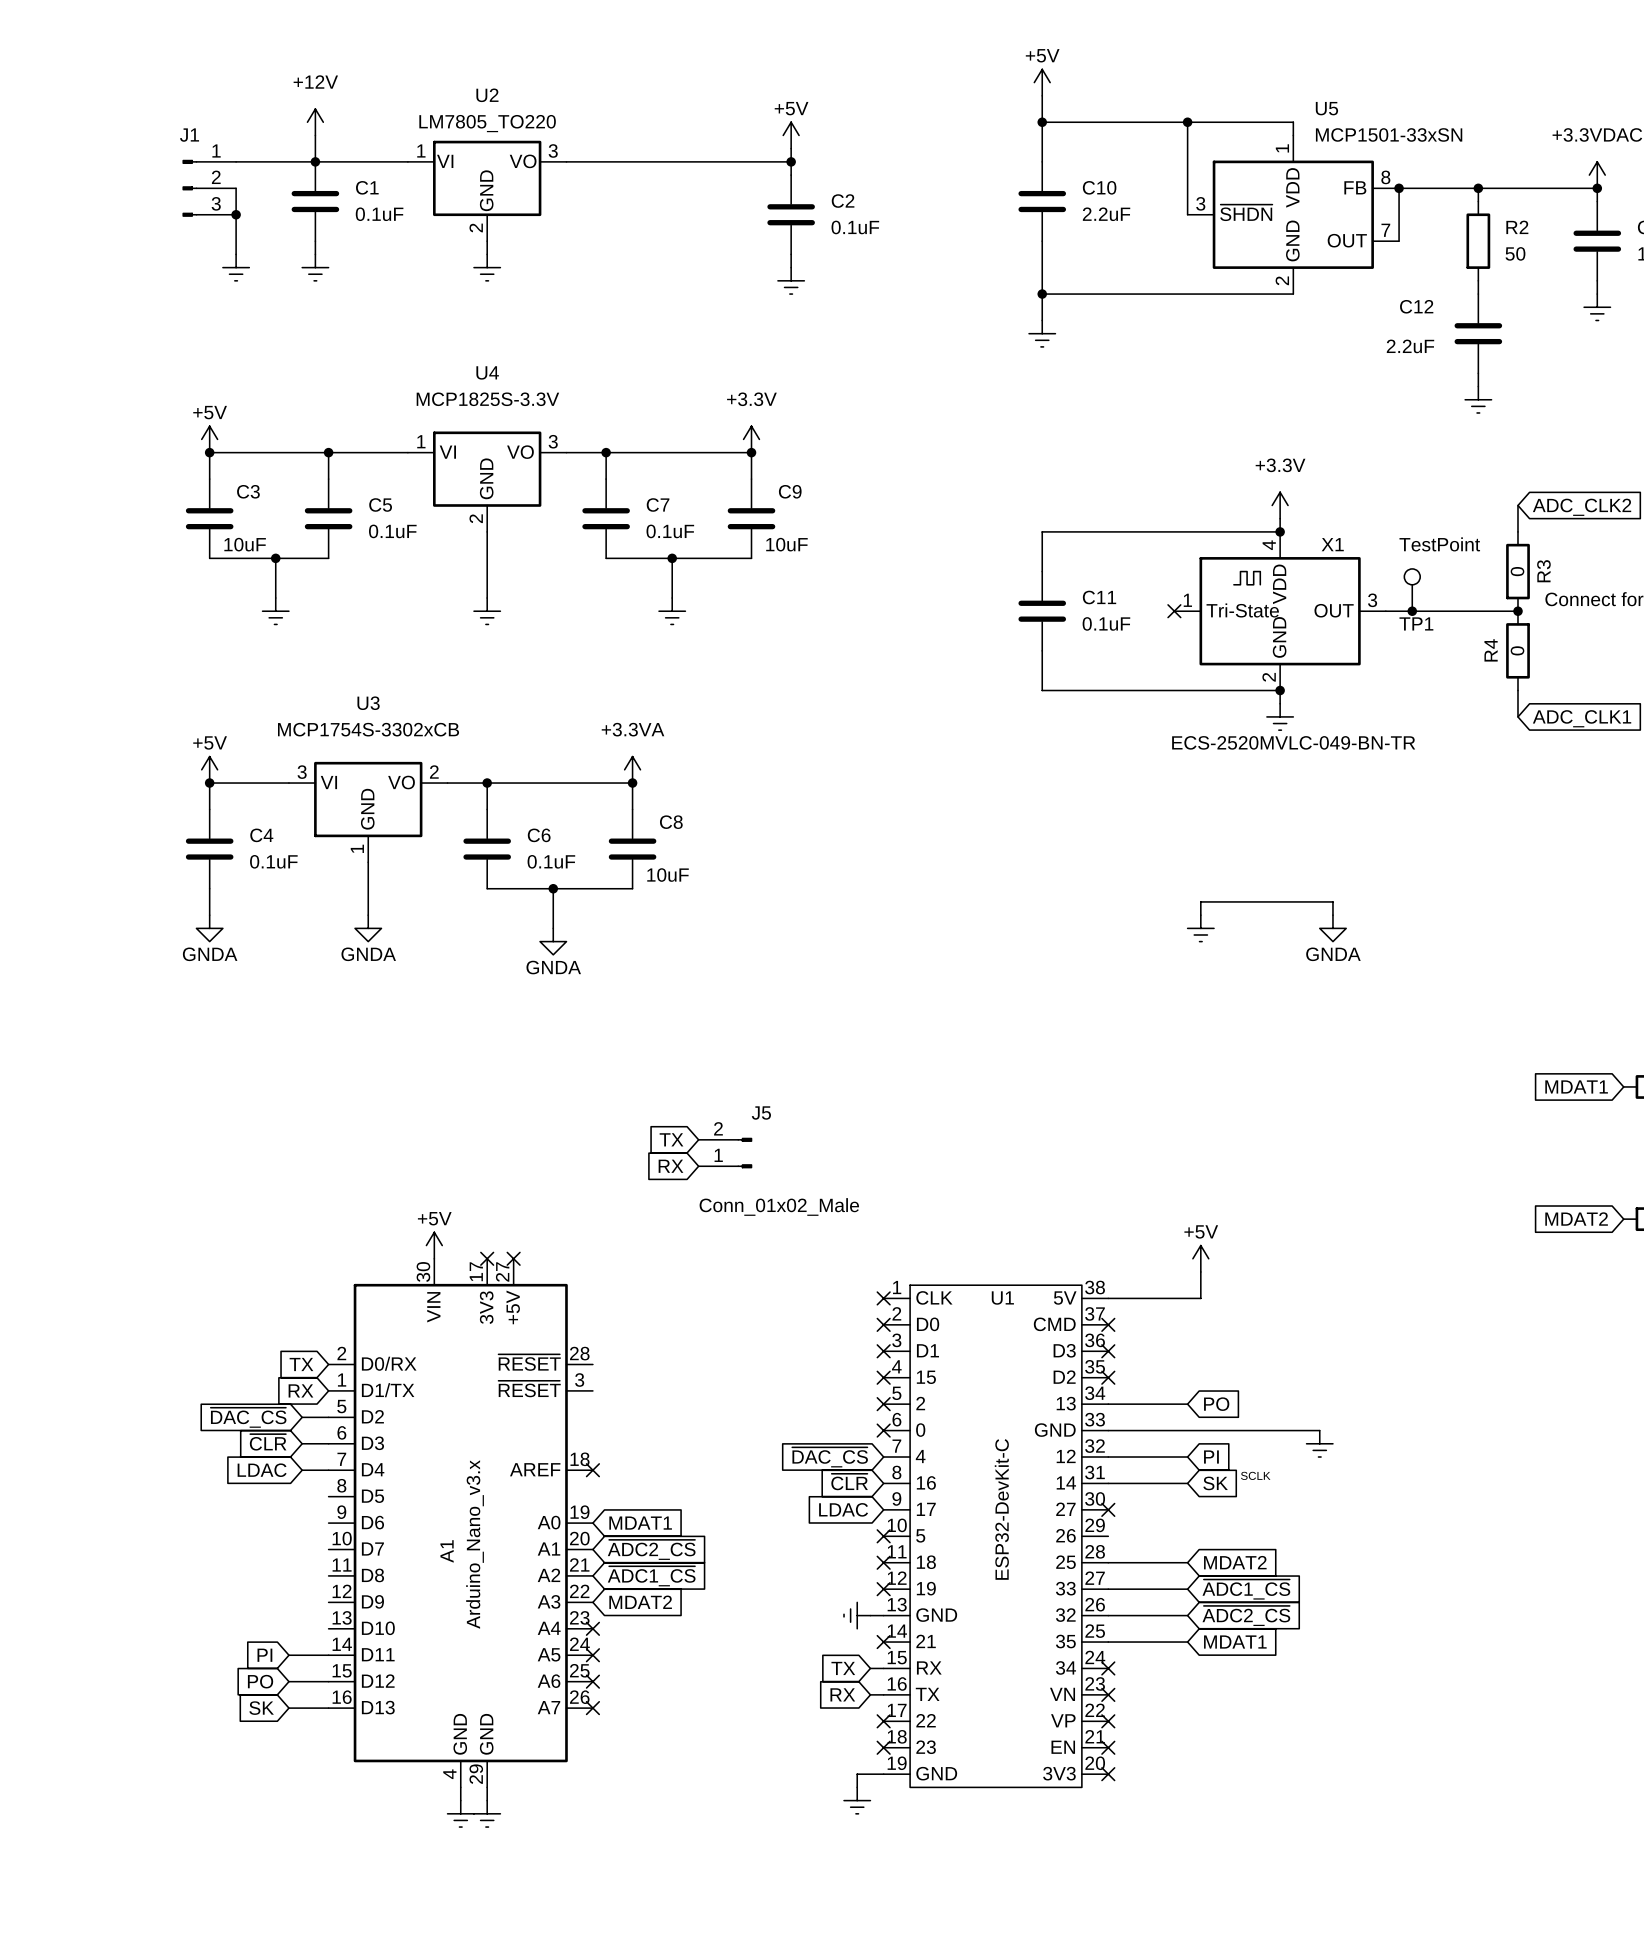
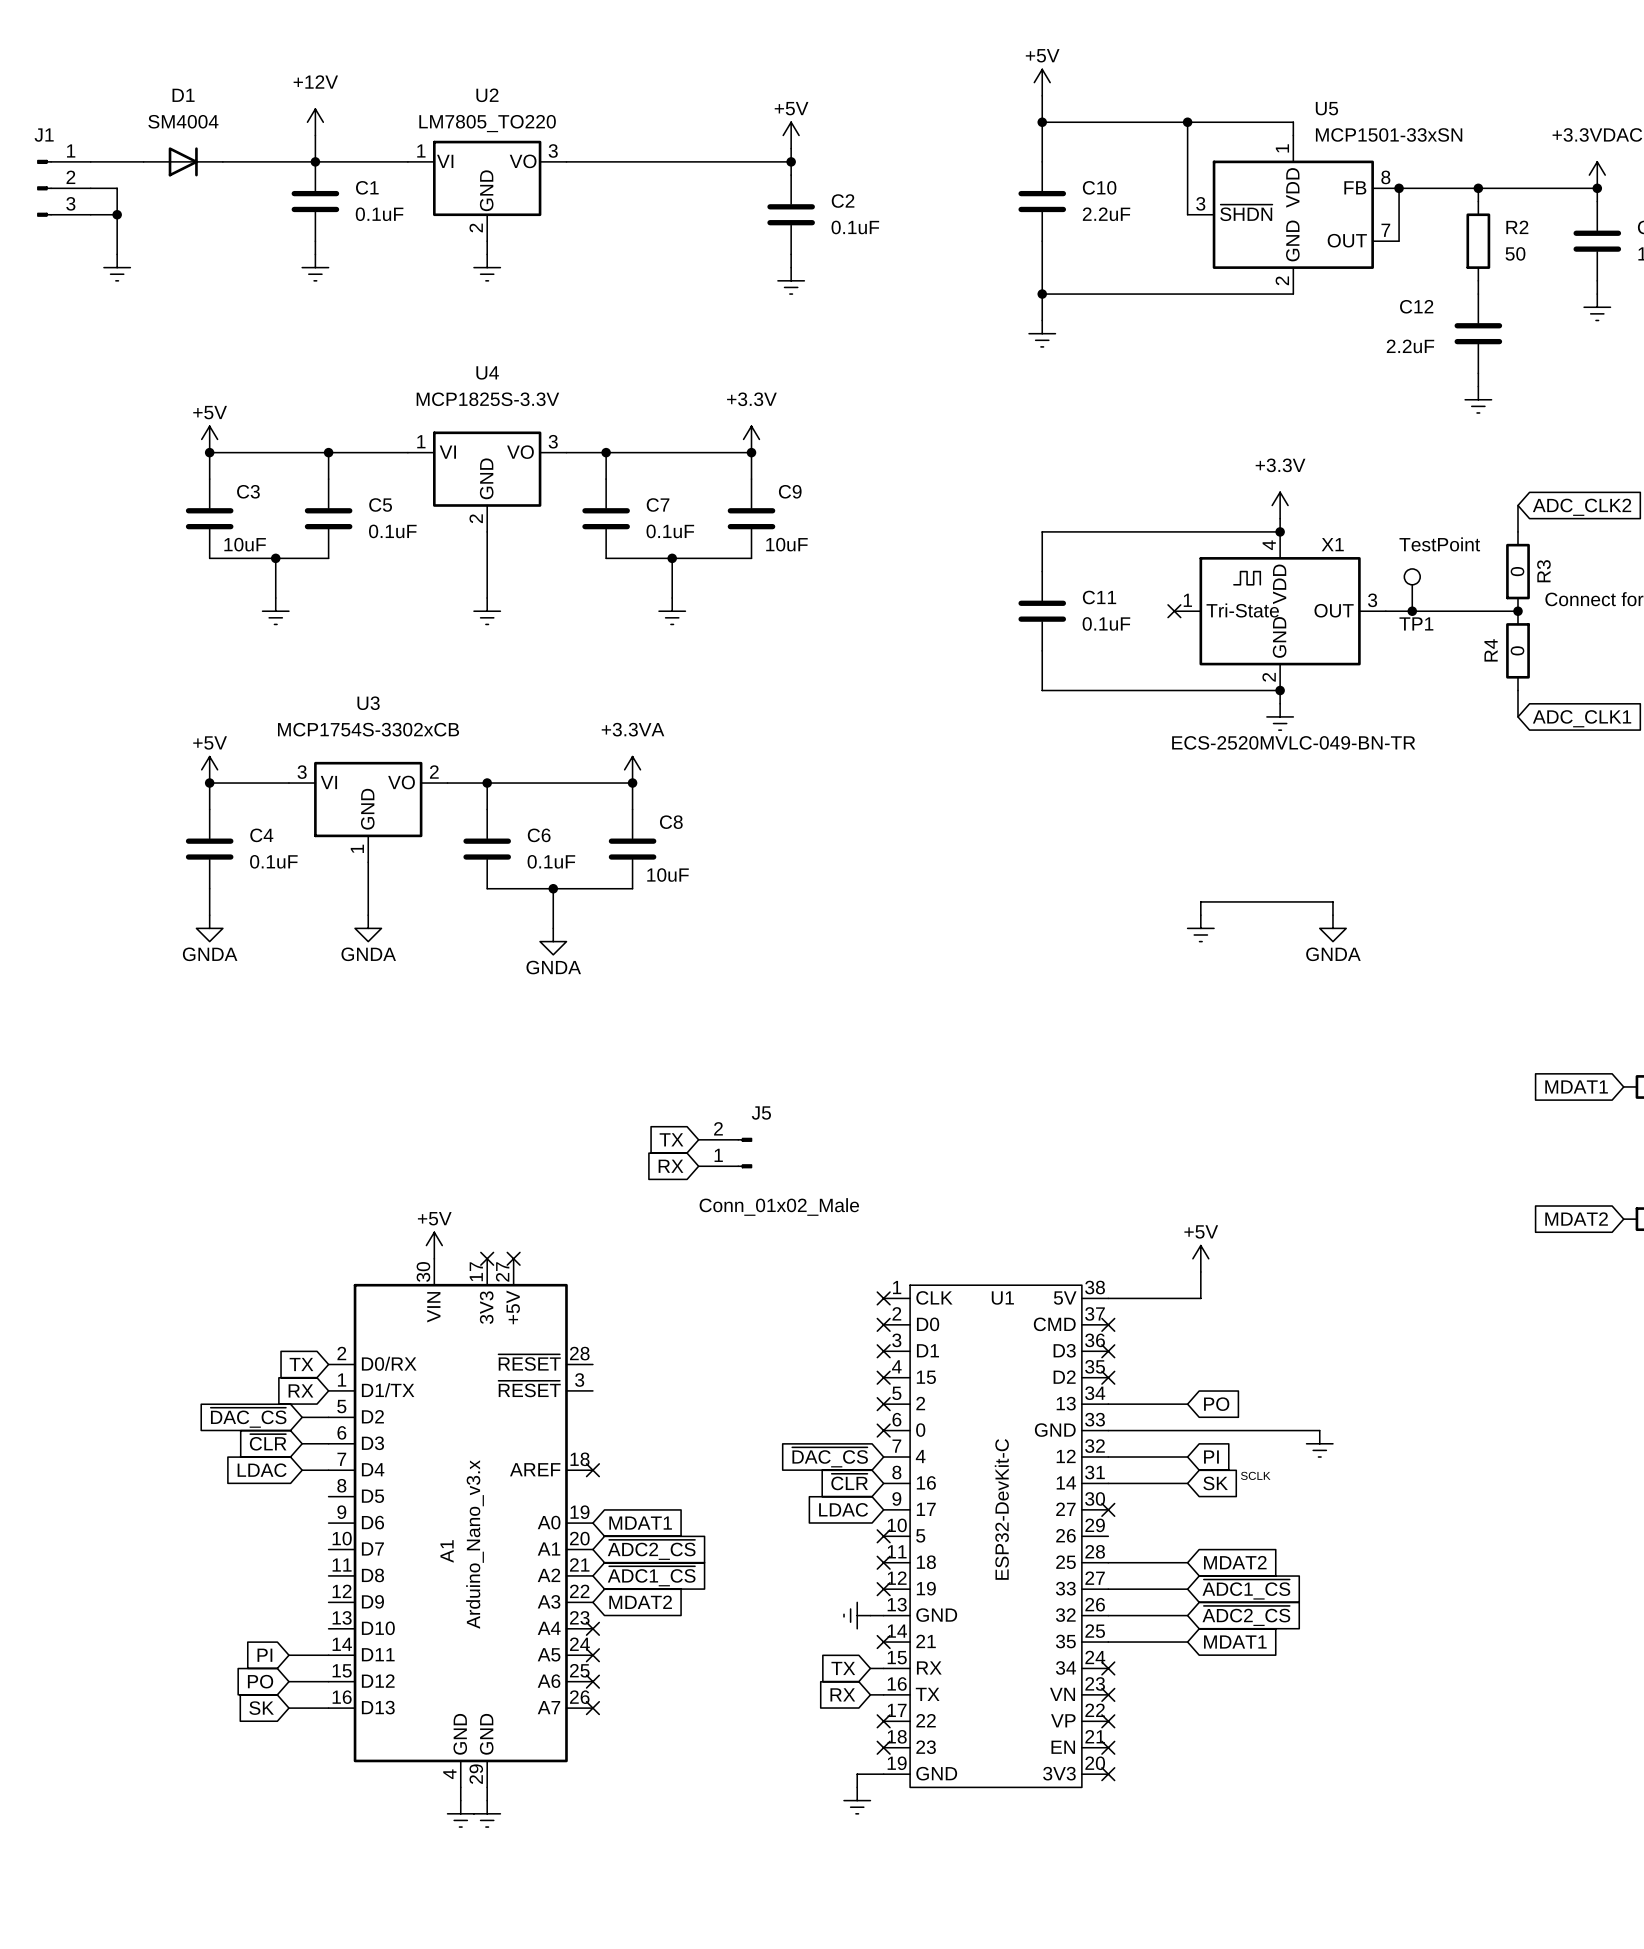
wire: none -> (90, 161) (143, 161)
D1: none -> SM4004 (183, 161)
wire: none -> (90, 188) (117, 188) (117, 254)
J1 position: (209, 188) -> (63, 188)
wire: (236, 188) (236, 254) -> none
wire: none -> (90, 214) (117, 214)
junction: none -> (117, 214)
junction: (236, 214) -> none
power symbol position: (236, 267) -> (117, 267)

